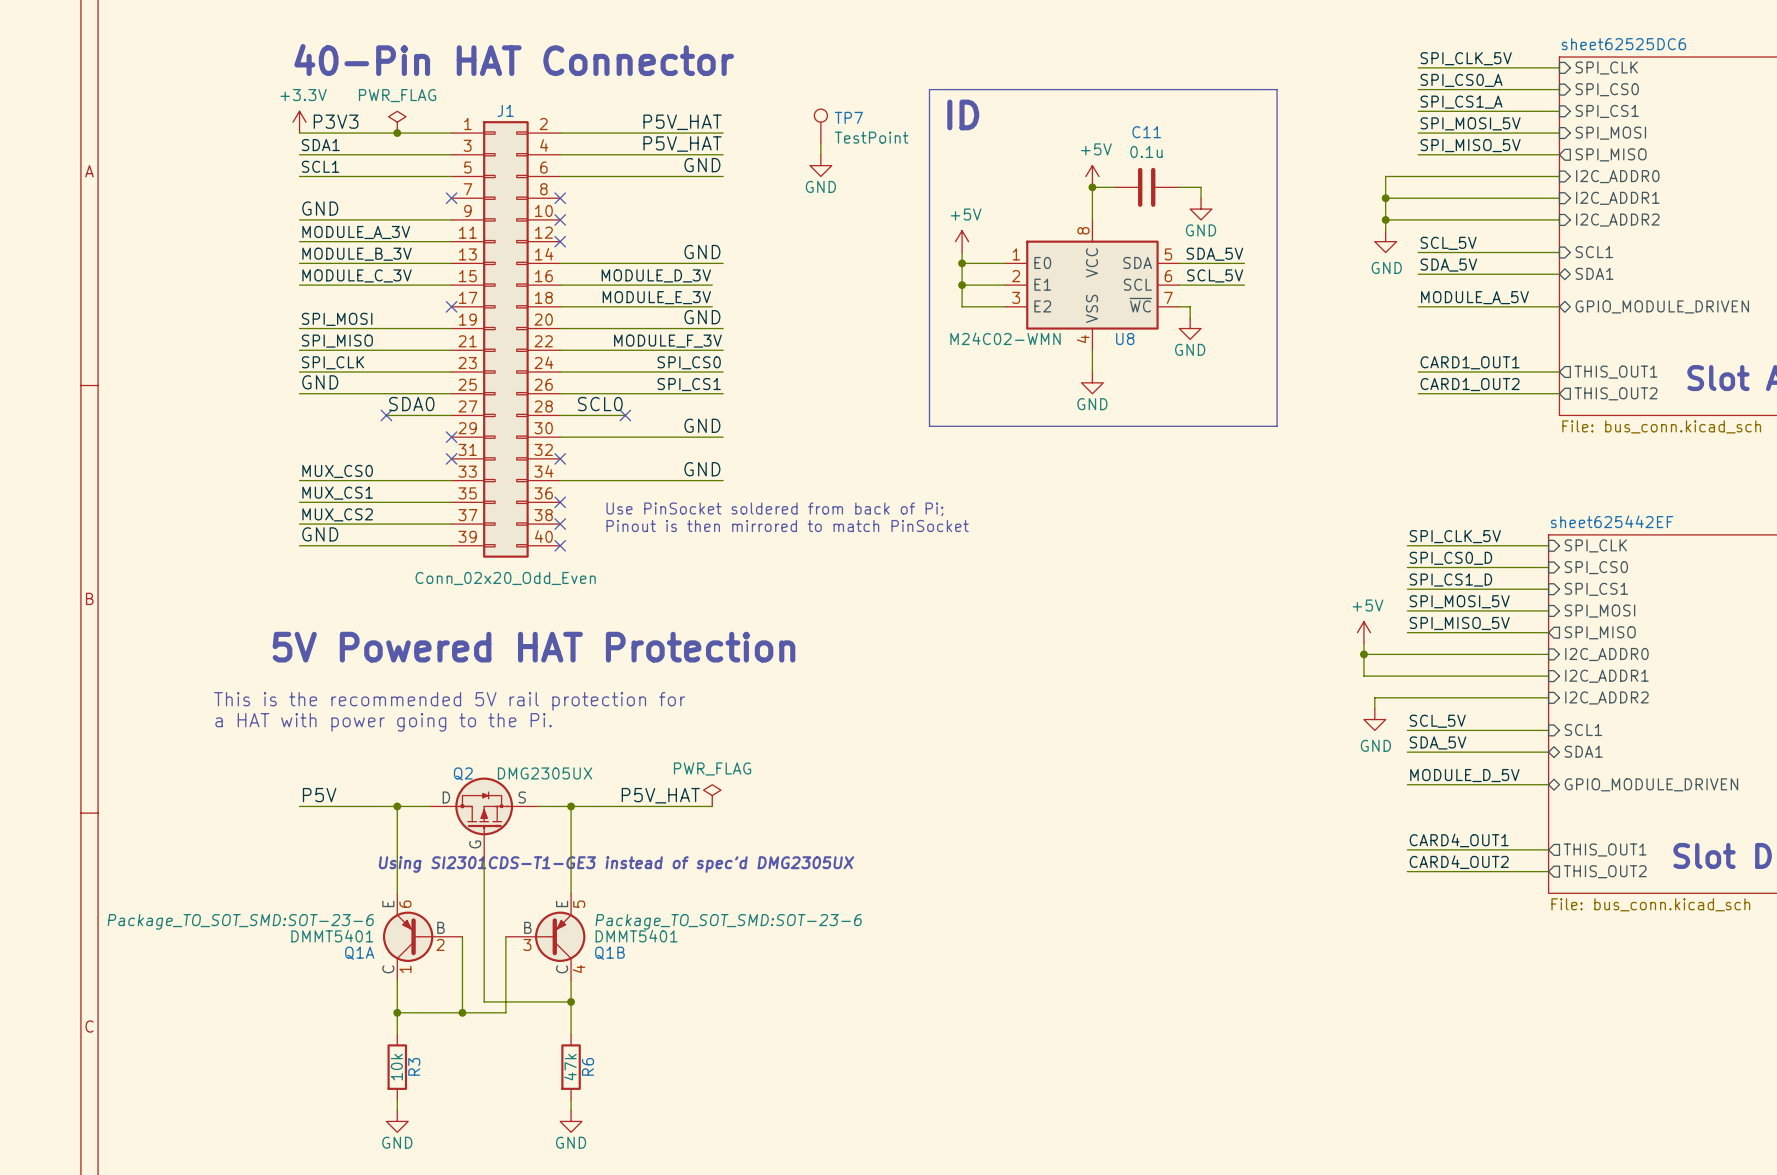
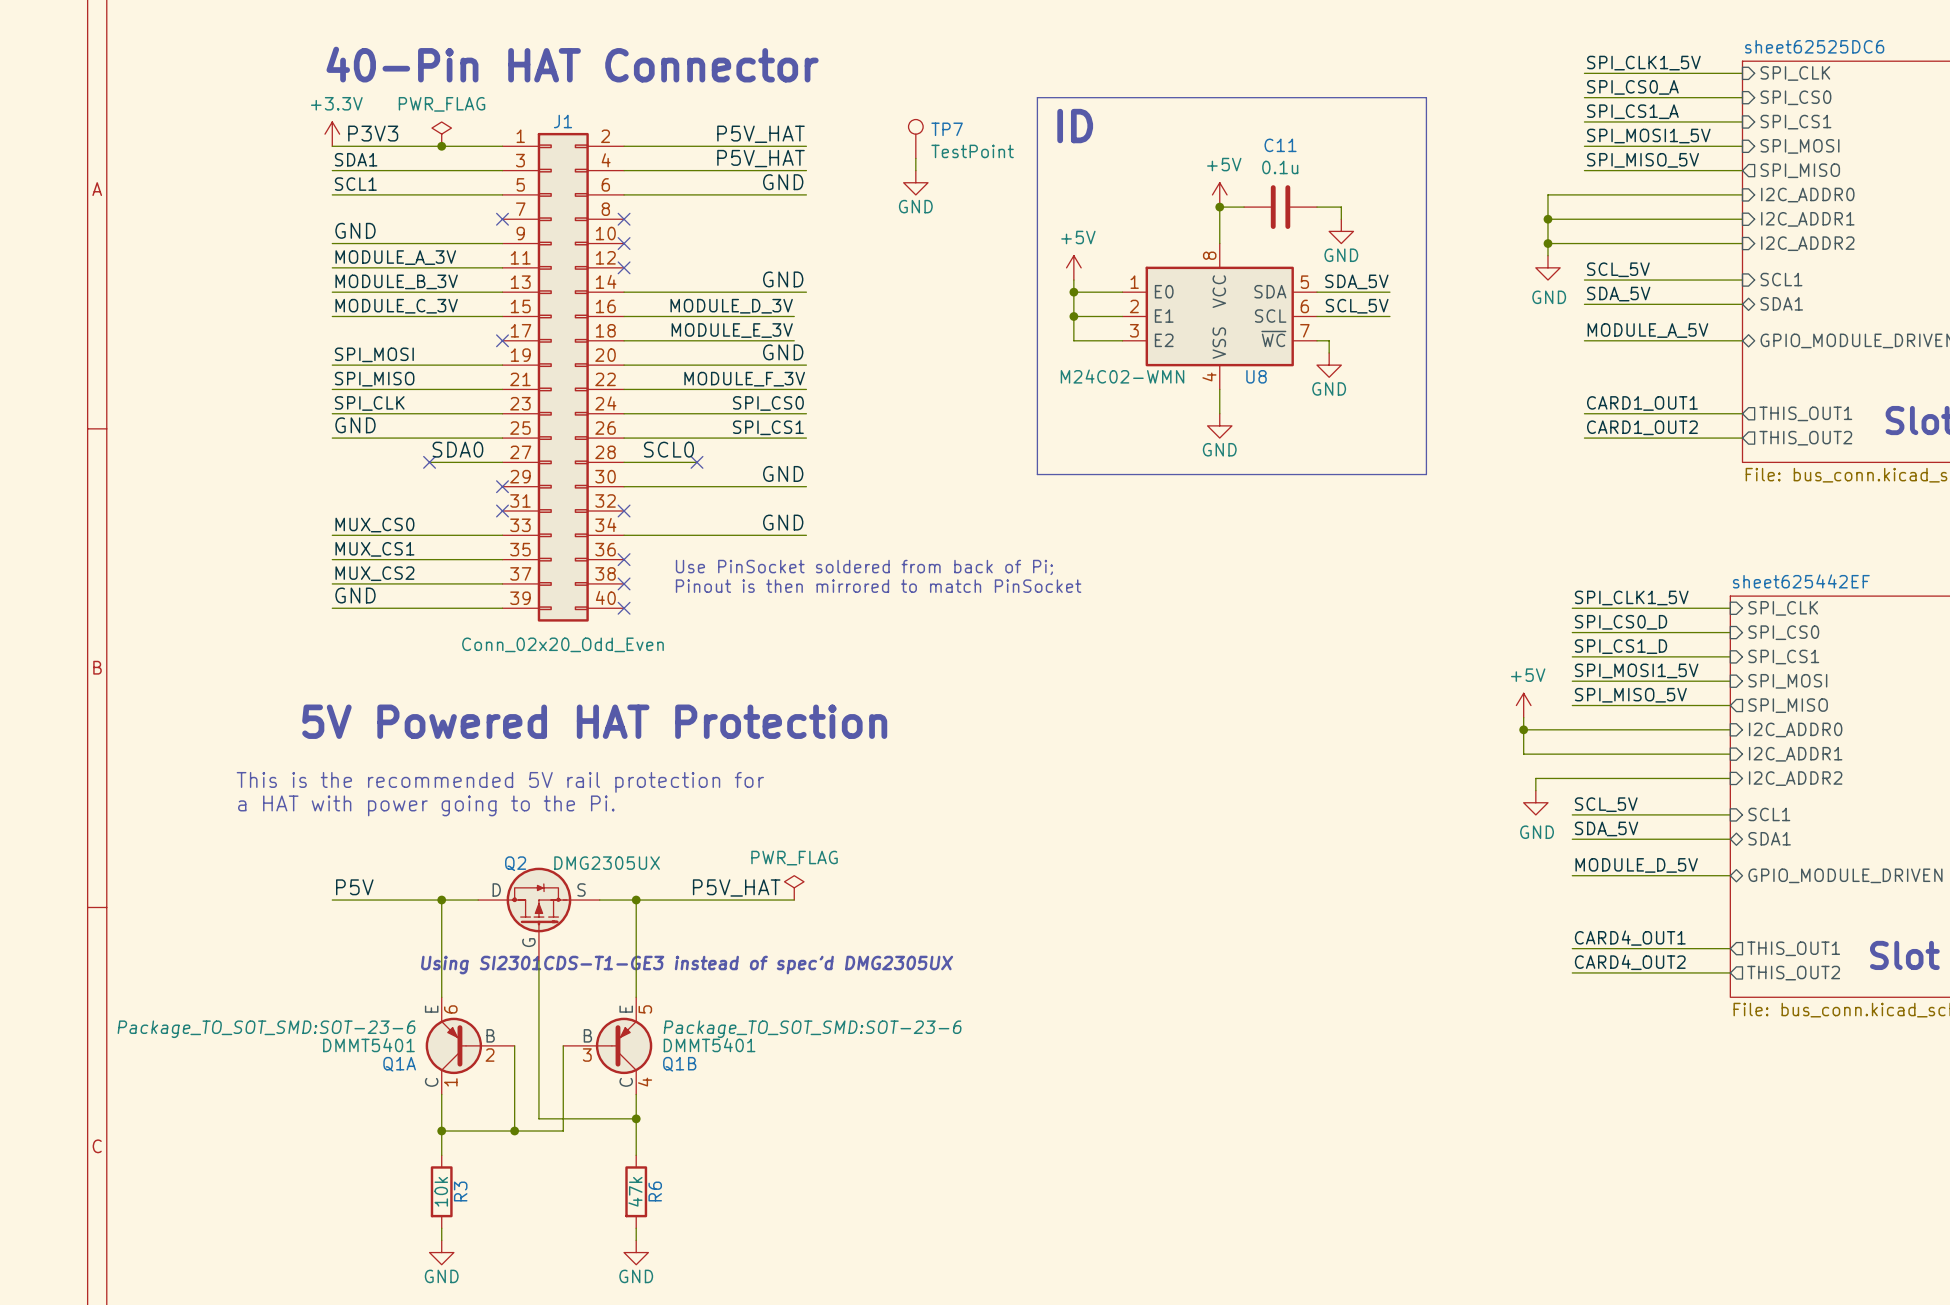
label: SPI_CLK_5V (1466, 58) -> SPI_CLK1_5V (1643, 63)
label: SPI_MOSI_5V (1470, 123) -> SPI_MOSI1_5V (1648, 136)
label: SPI_CLK_5V (1455, 536) -> SPI_CLK1_5V (1631, 597)
label: SPI_MOSI_5V (1459, 601) -> SPI_MOSI1_5V (1636, 670)

